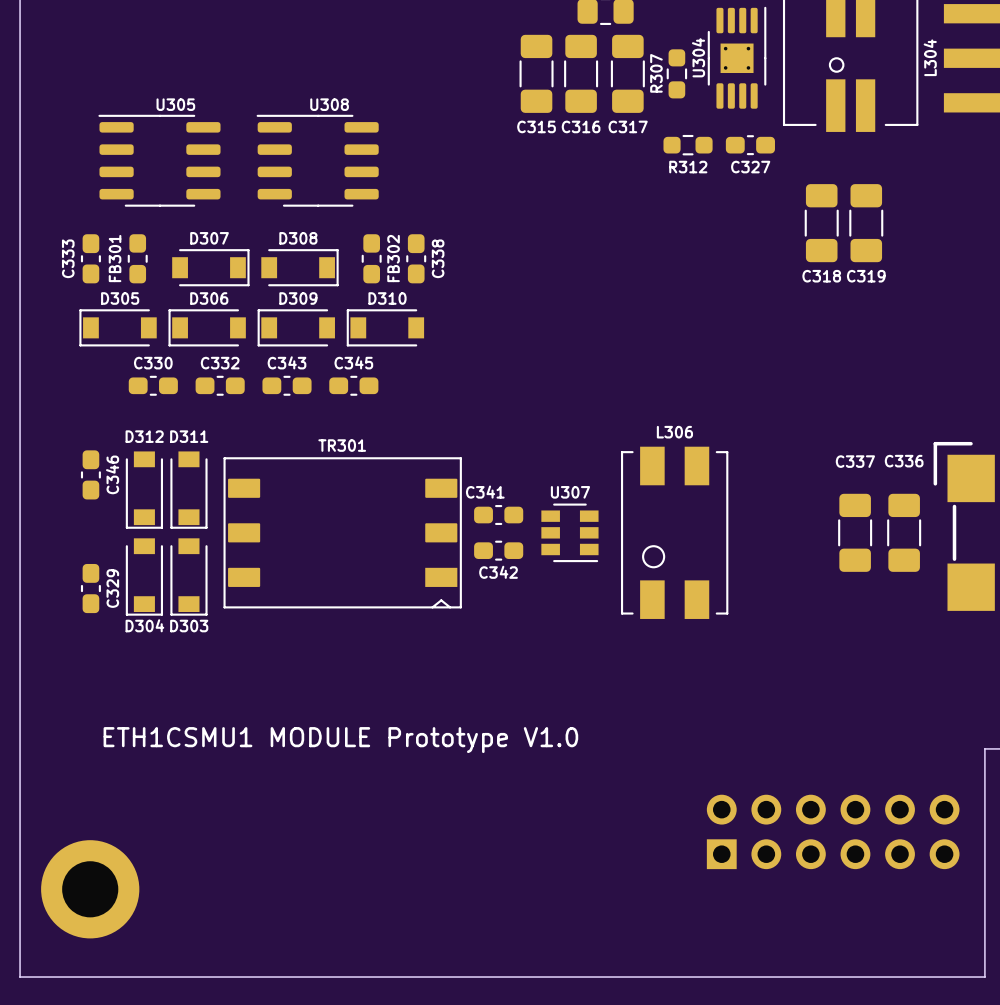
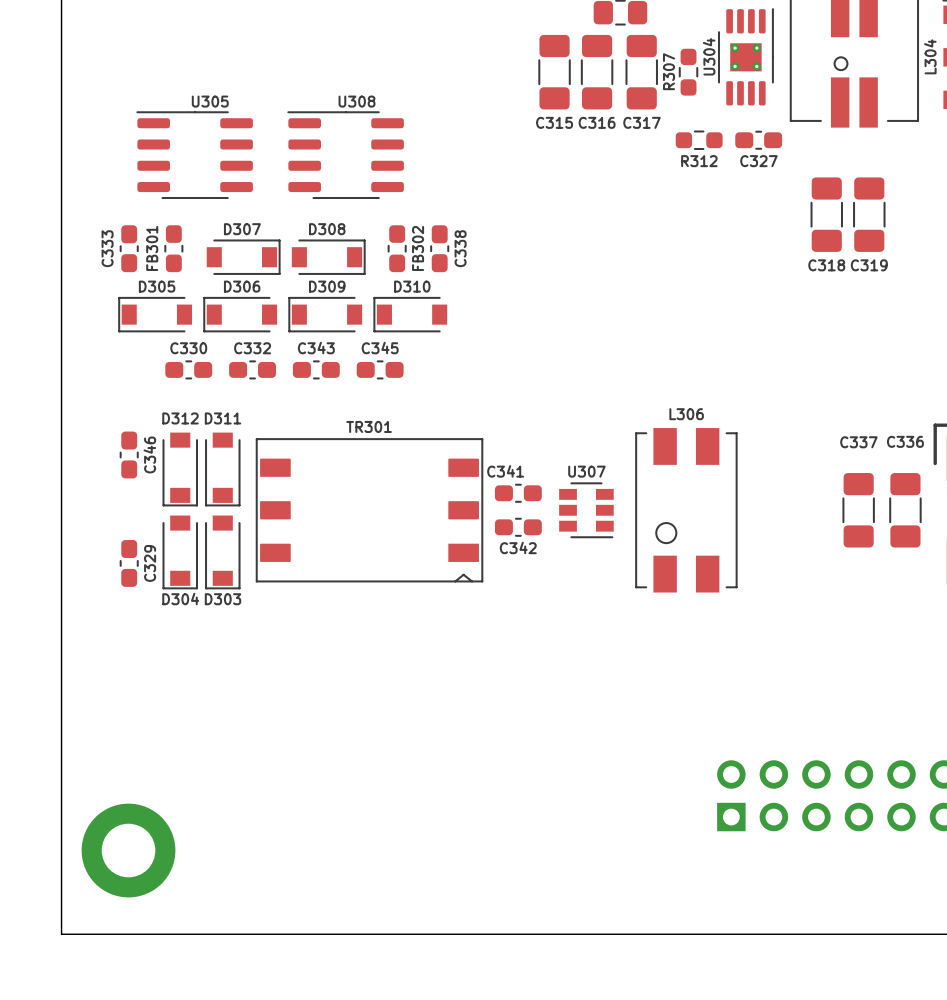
text: ETH1CSMU1 MODULE Prototype V1.0 (340, 740) -> none

